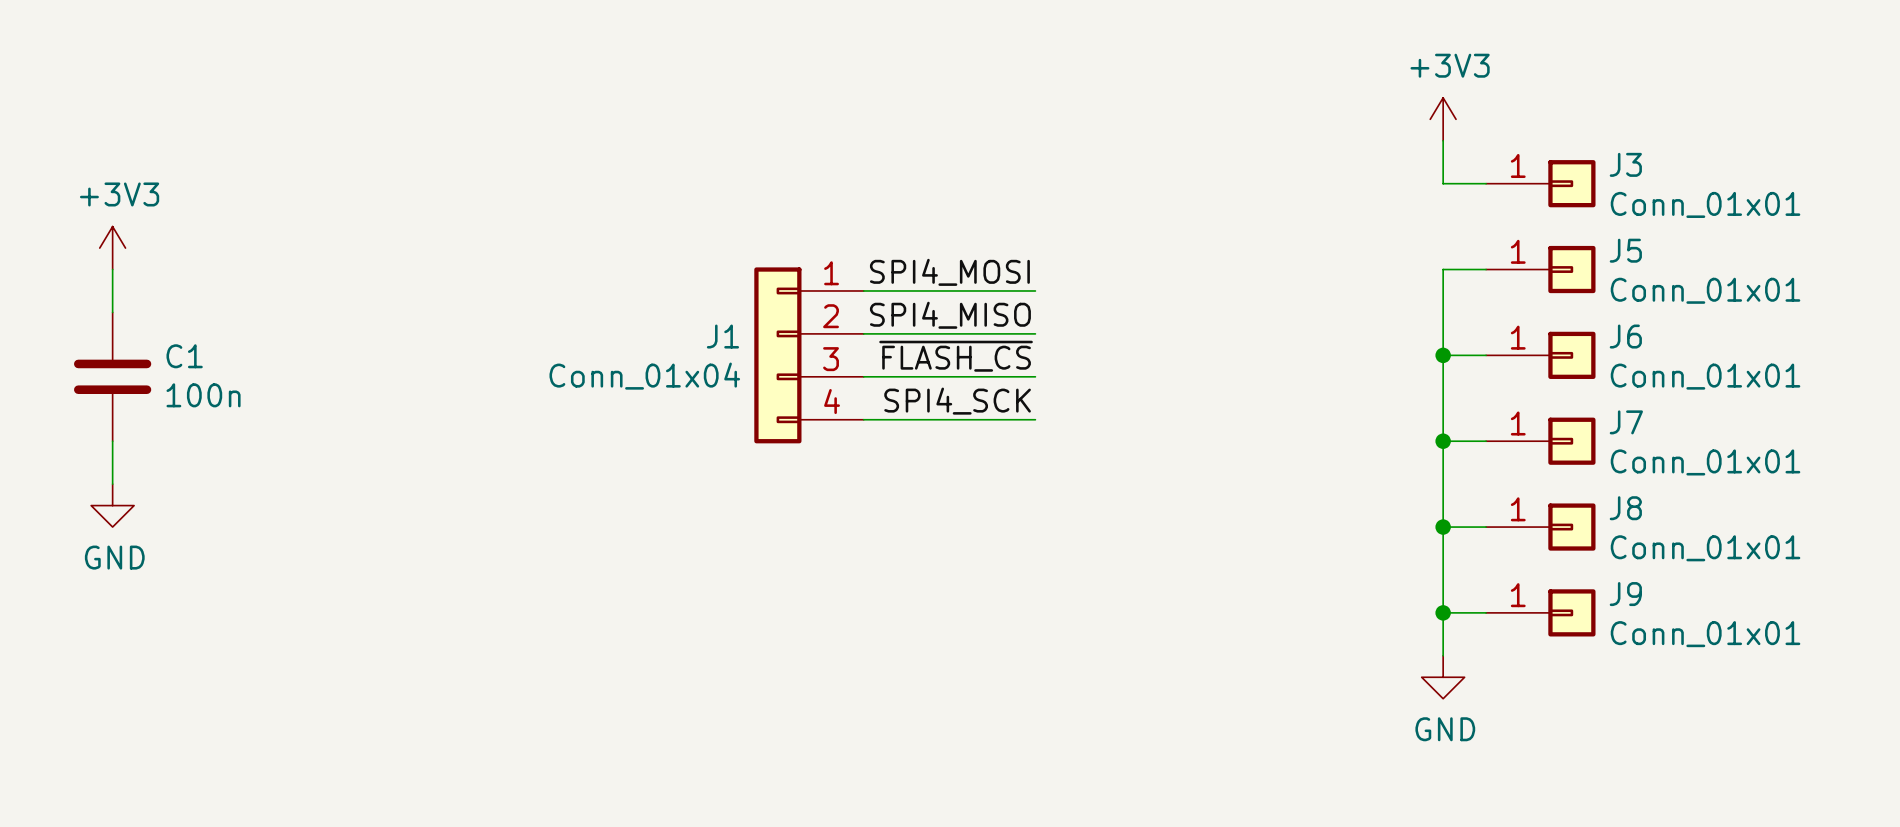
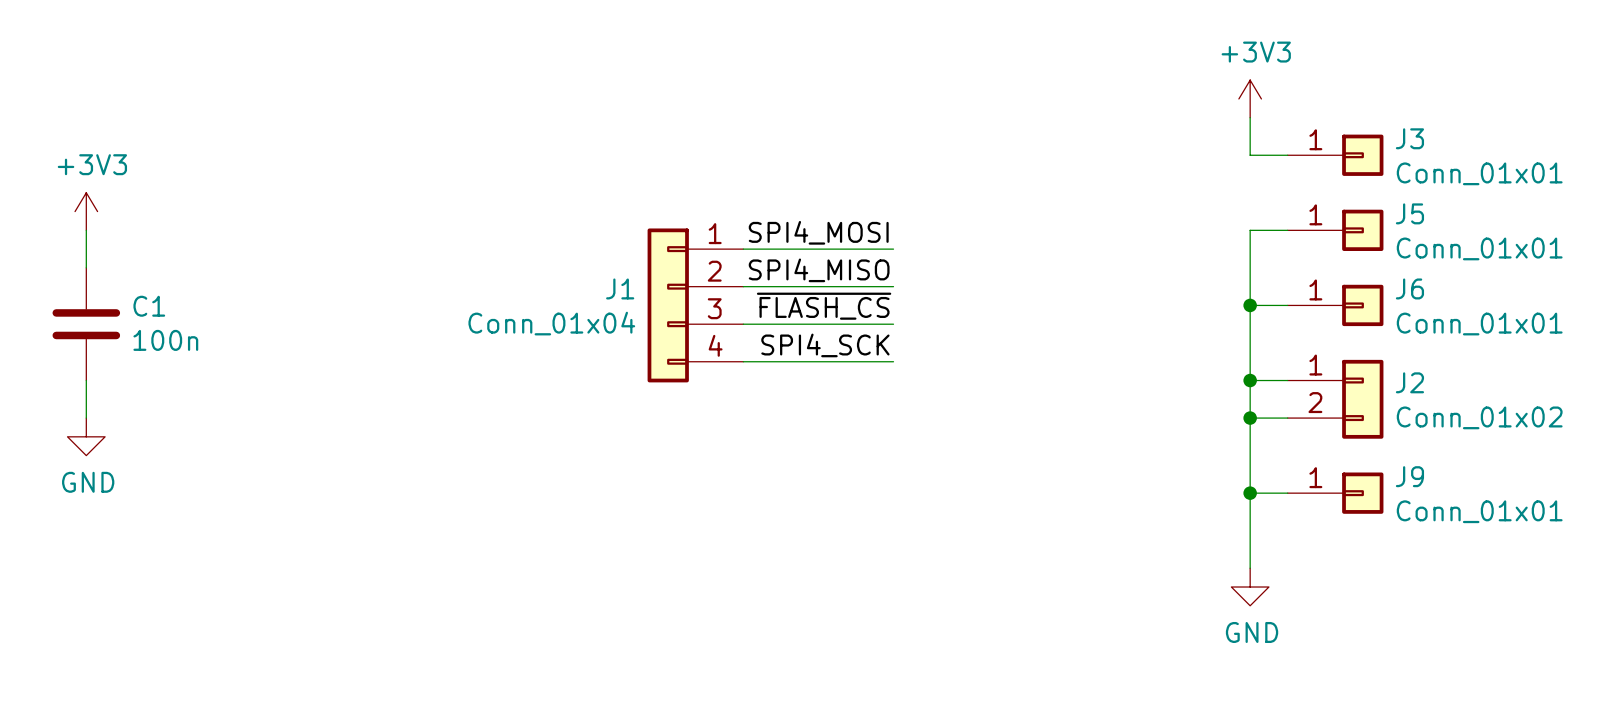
J7: Conn_01x01 (1540, 441) -> none
J2: none -> Conn_01x02 (1335, 399)
junction: none -> (1250, 418)
wire: (1443, 527) (1486, 527) -> (1250, 493) (1287, 493)
junction: (1443, 527) -> none
J8: Conn_01x01 (1540, 527) -> none
junction: none -> (1250, 493)
wire: (1443, 612) (1486, 612) -> (1250, 418) (1287, 418)
junction: (1443, 612) -> none
J9 position: (1540, 612) -> (1335, 493)

